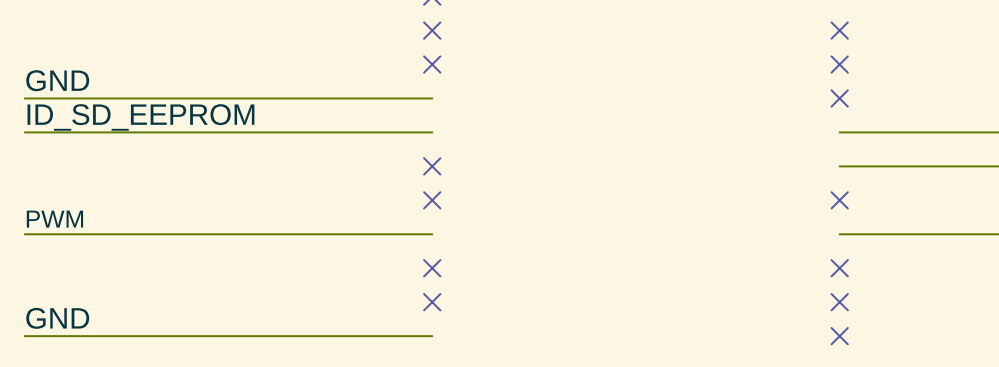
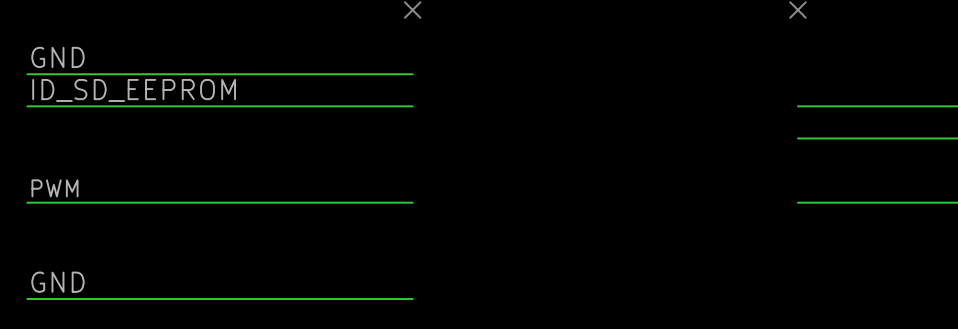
no-connect mark: (432, 64) -> none
no-connect mark: (839, 64) -> none
no-connect mark: (839, 98) -> none
no-connect mark: (432, 166) -> none
no-connect mark: (432, 200) -> none
no-connect mark: (839, 200) -> none
no-connect mark: (432, 268) -> none
no-connect mark: (839, 268) -> none
no-connect mark: (432, 302) -> none
no-connect mark: (839, 302) -> none
no-connect mark: (839, 336) -> none

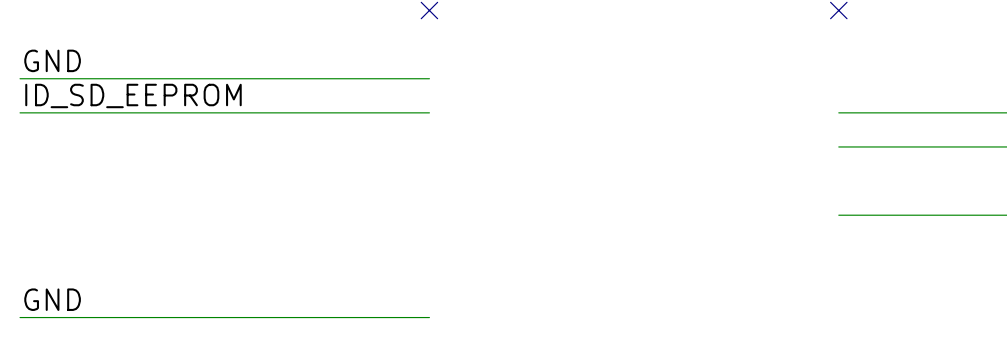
label: PWM (54, 188) -> none
wire: (27, 202) (412, 202) -> none

